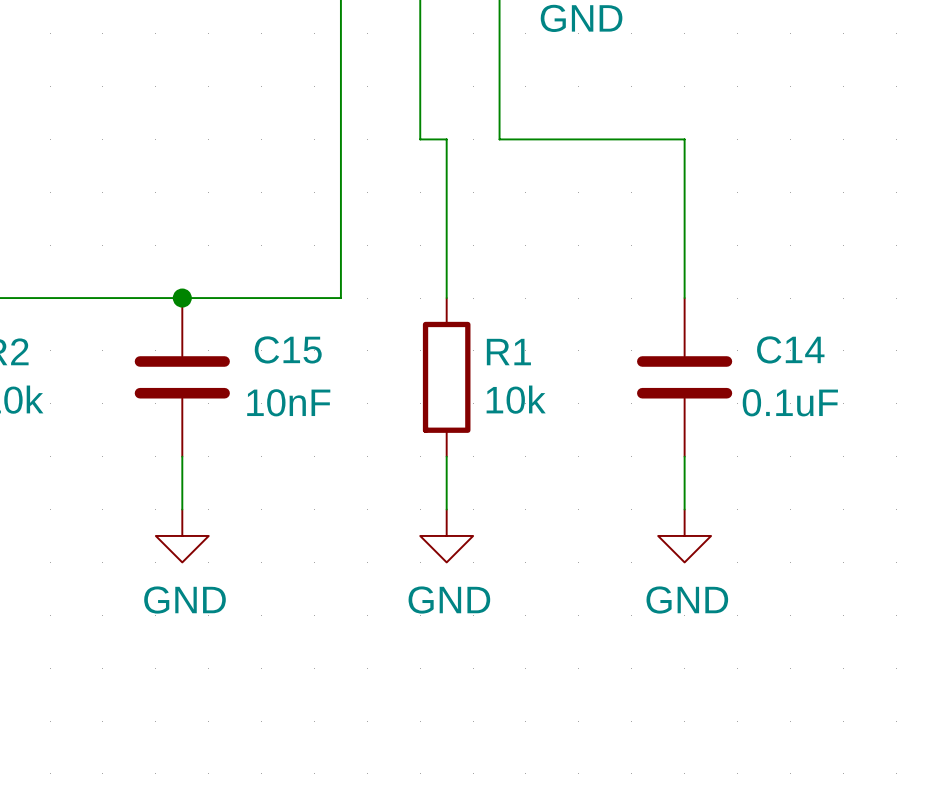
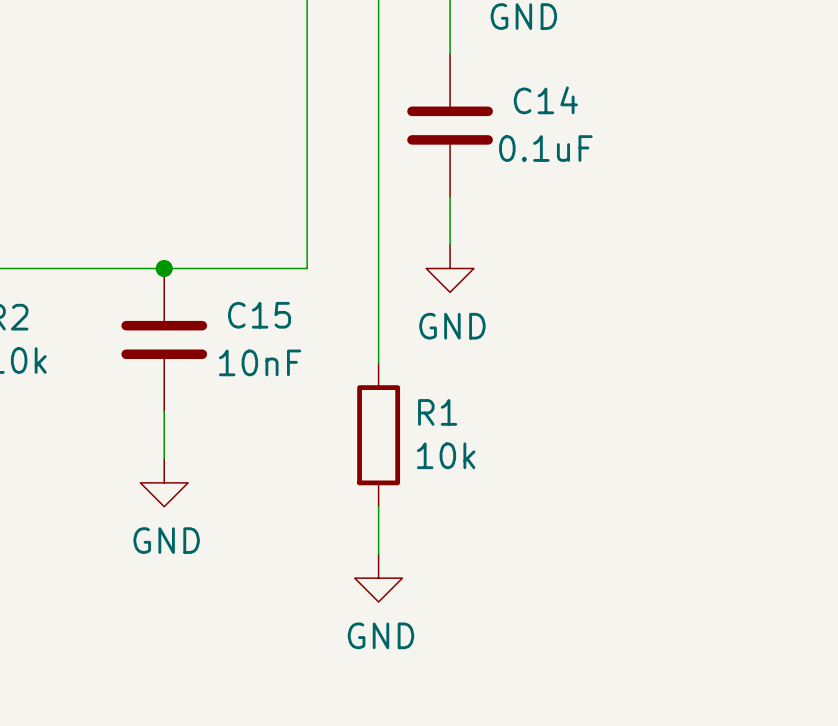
wire: (499, 60) (499, 139) (684, 139) (684, 298) -> none
wire: (420, 139) (446, 139) (446, 298) -> (378, 125) (378, 363)
power symbol: none -> GND (450, 268)
R1 position: (446, 377) -> (378, 435)
C14 position: (684, 377) -> (450, 125)
wire: (446, 456) (446, 509) -> (378, 506) (378, 554)
wire: (684, 456) (684, 509) -> (450, 197) (450, 244)
power symbol position: GND (446, 535) -> GND (378, 578)
power symbol: GND (684, 535) -> none

